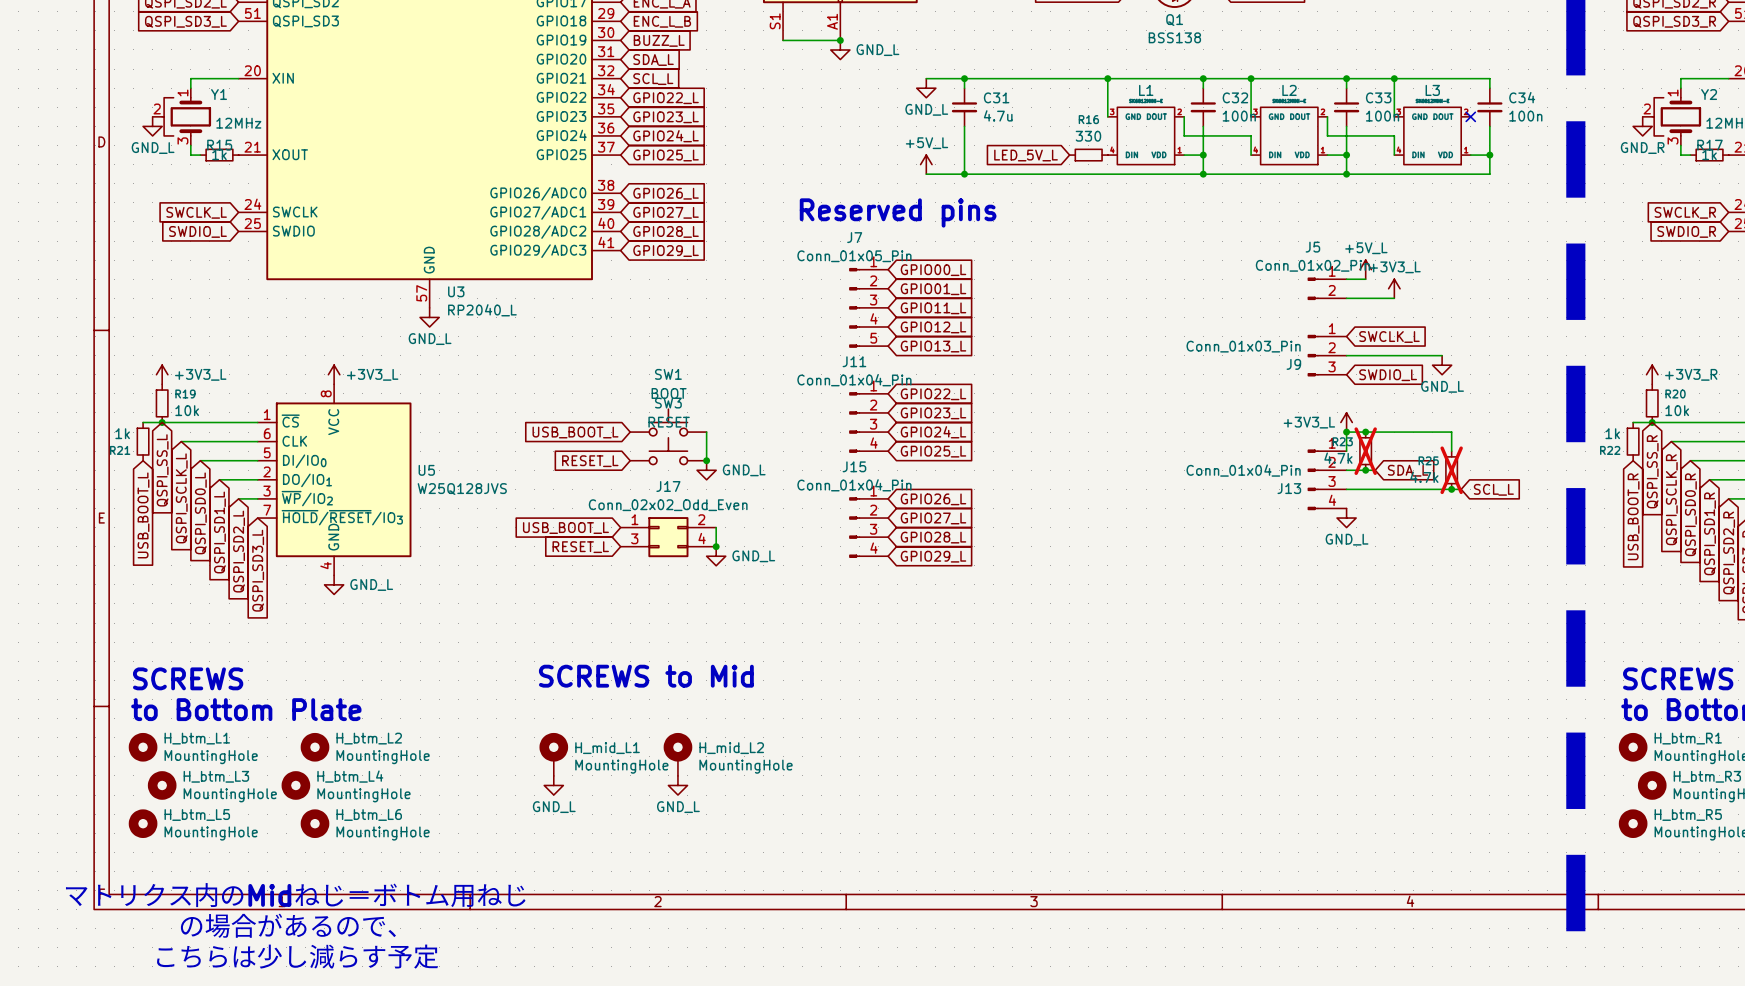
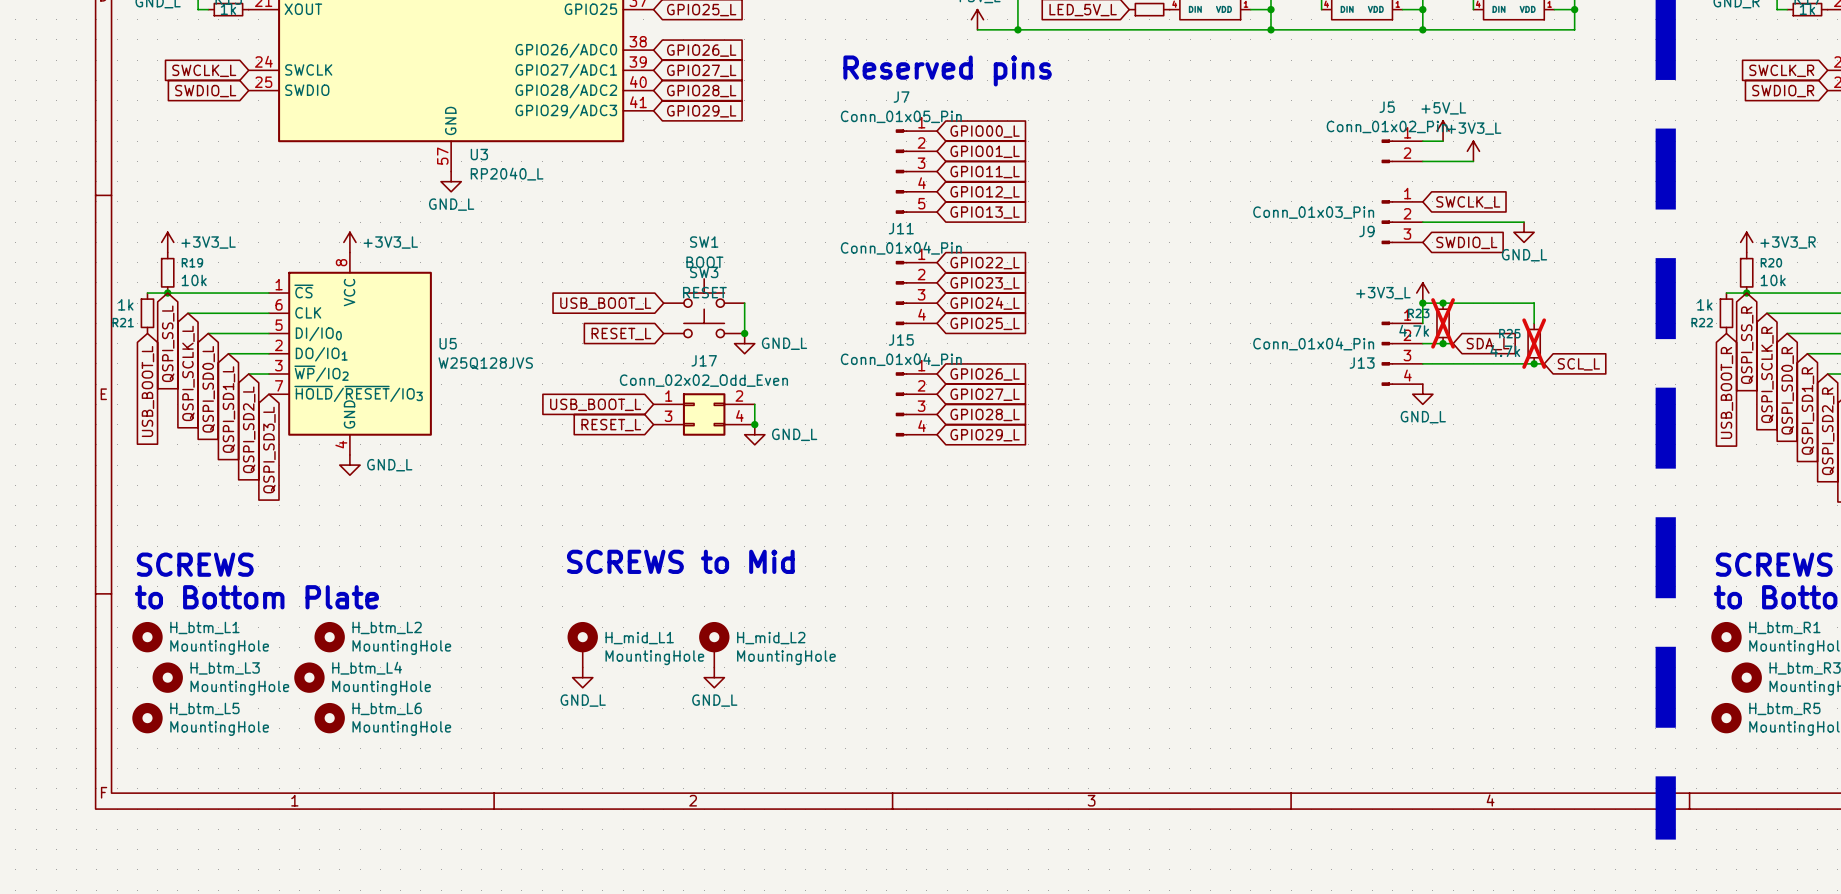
text: マトリクス内のMidねじ＝ボトム用ねじ (295, 895) -> none
text: の場合があるので、 (288, 925) -> none
text: こちらは少し減らす予定 (297, 956) -> none

